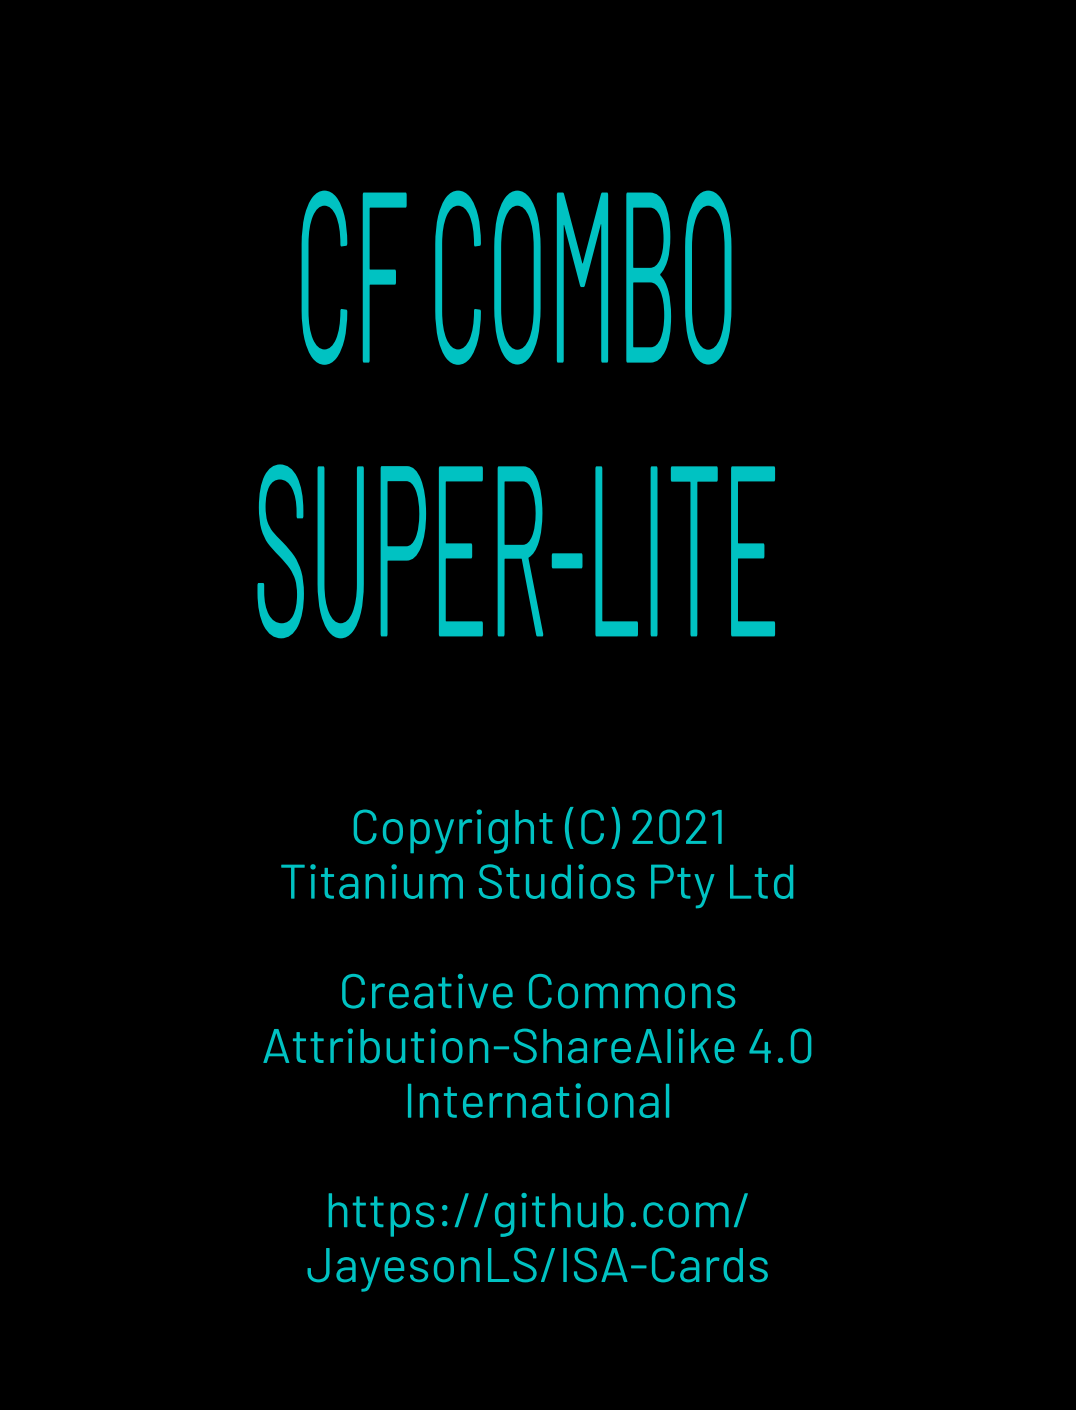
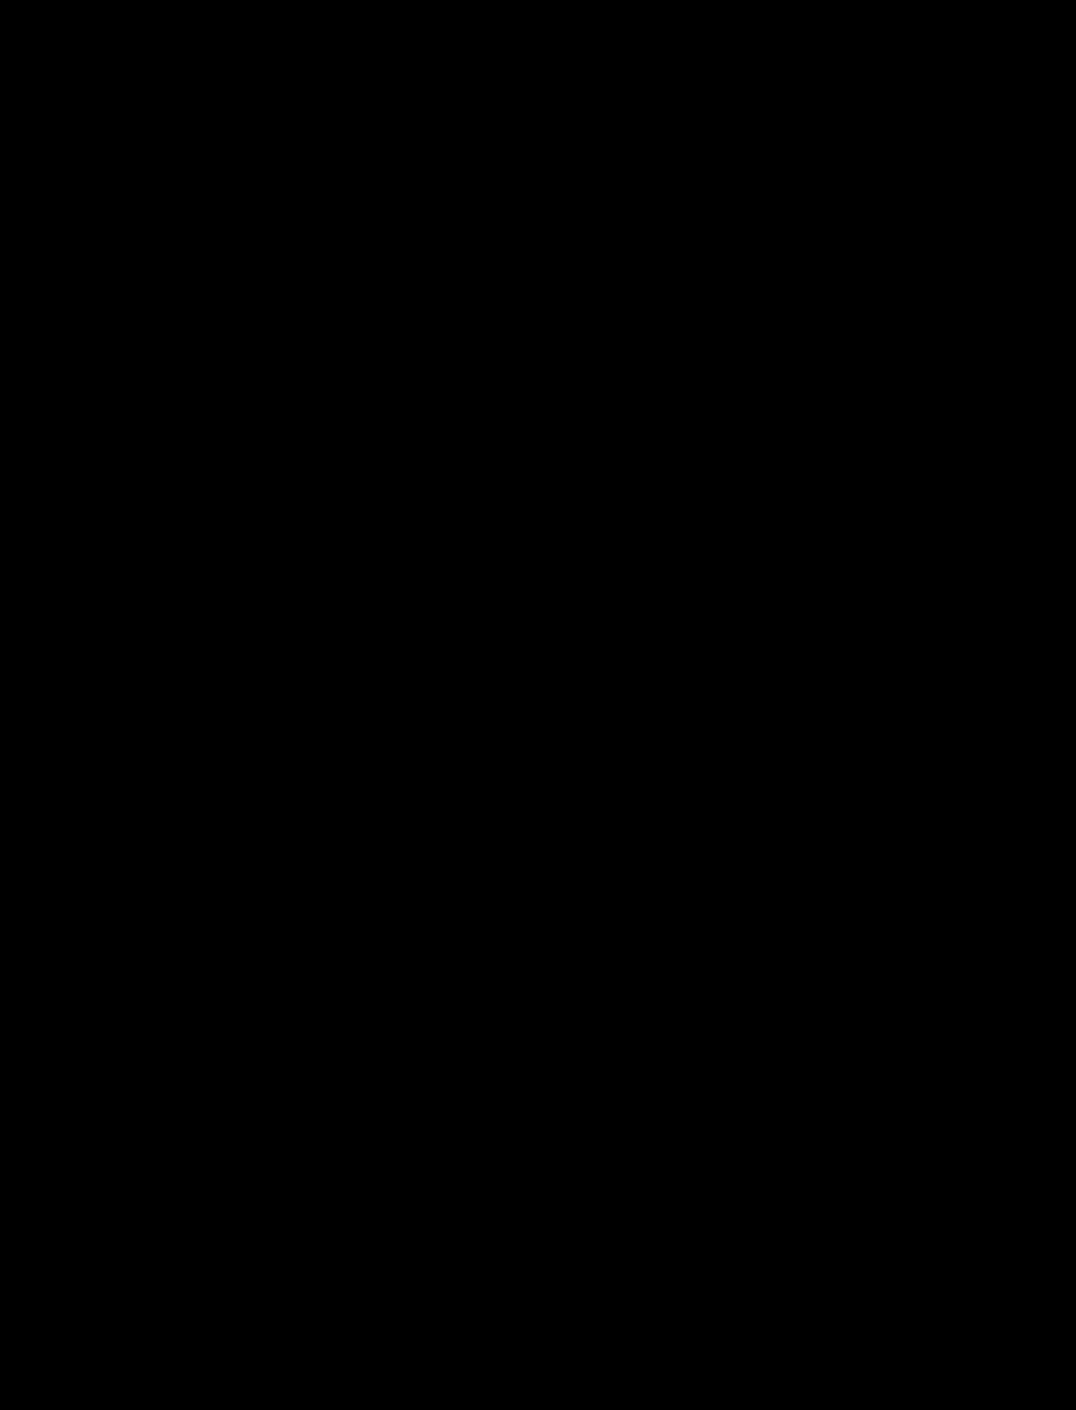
text: CF COMBO (516, 277) -> none
text: SUPER-LITE (516, 551) -> none
text: Copyright (C) 2021 (537, 830) -> none
text: Titanium Studios Pty Ltd (537, 886) -> none
text: Creative Commons (538, 991) -> none
text: Attribution-ShareAlike 4.0 (537, 1045) -> none
text: International (538, 1100) -> none
text: https://github.com/ (538, 1214) -> none
text: JayesonLS/ISA-Cards (537, 1269) -> none

